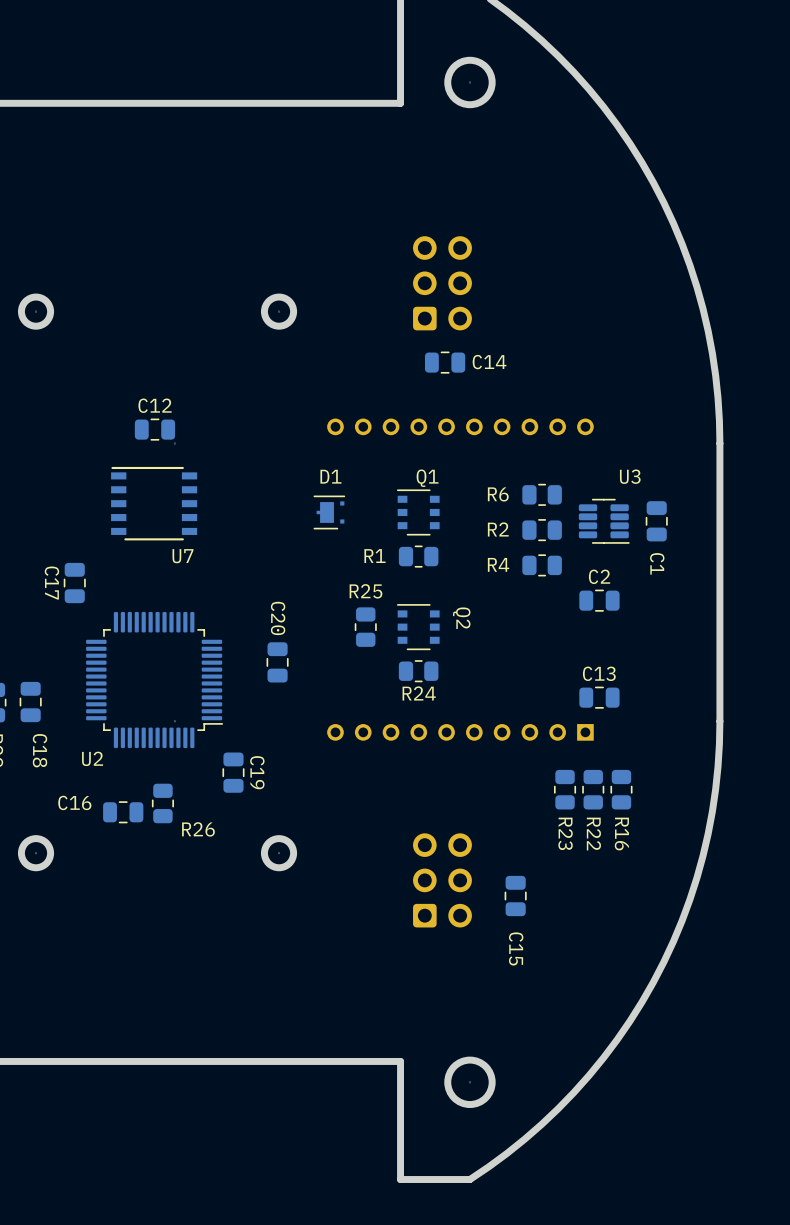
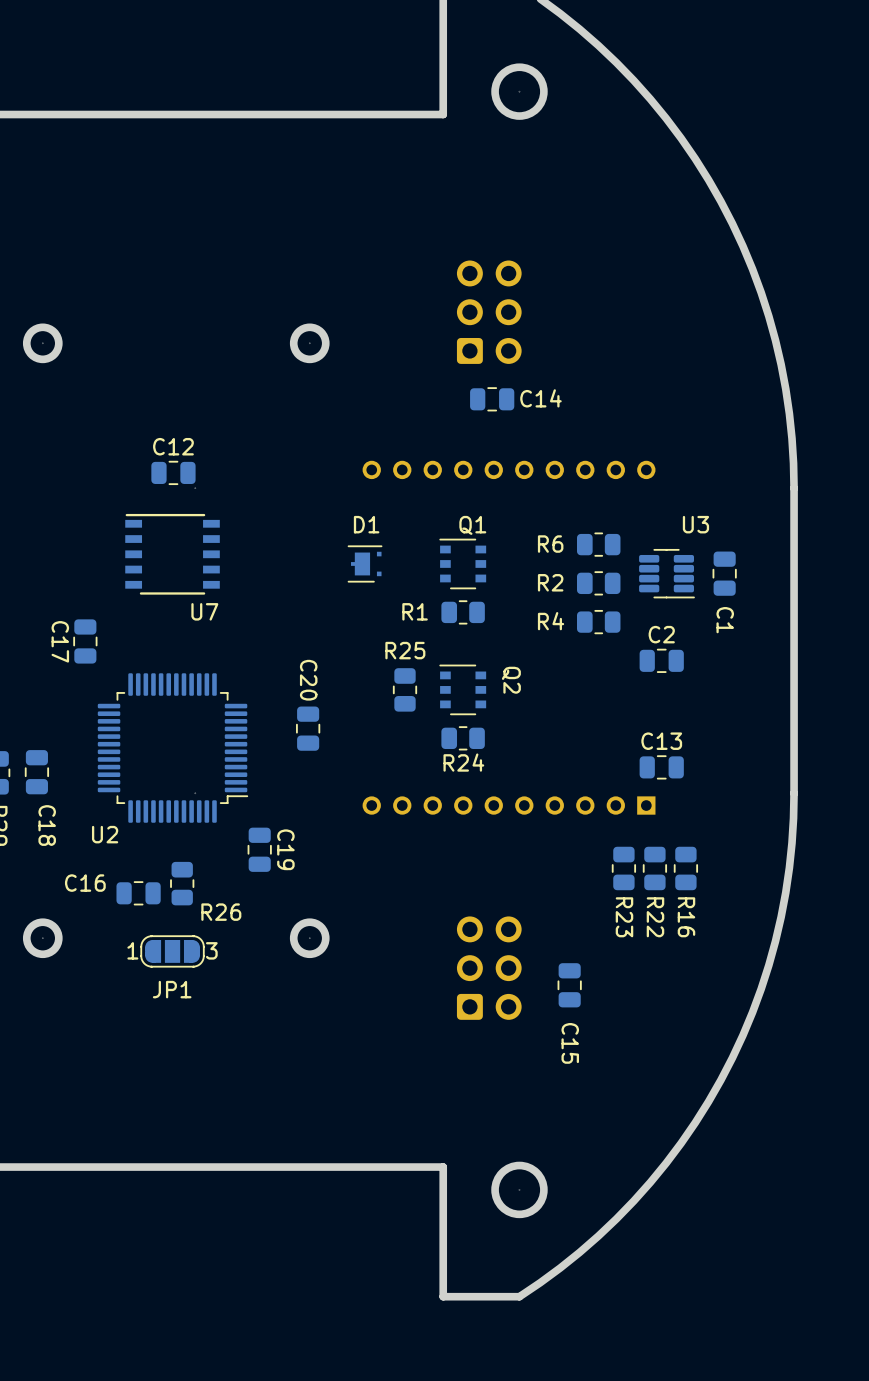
JP1: none -> (172, 951)

